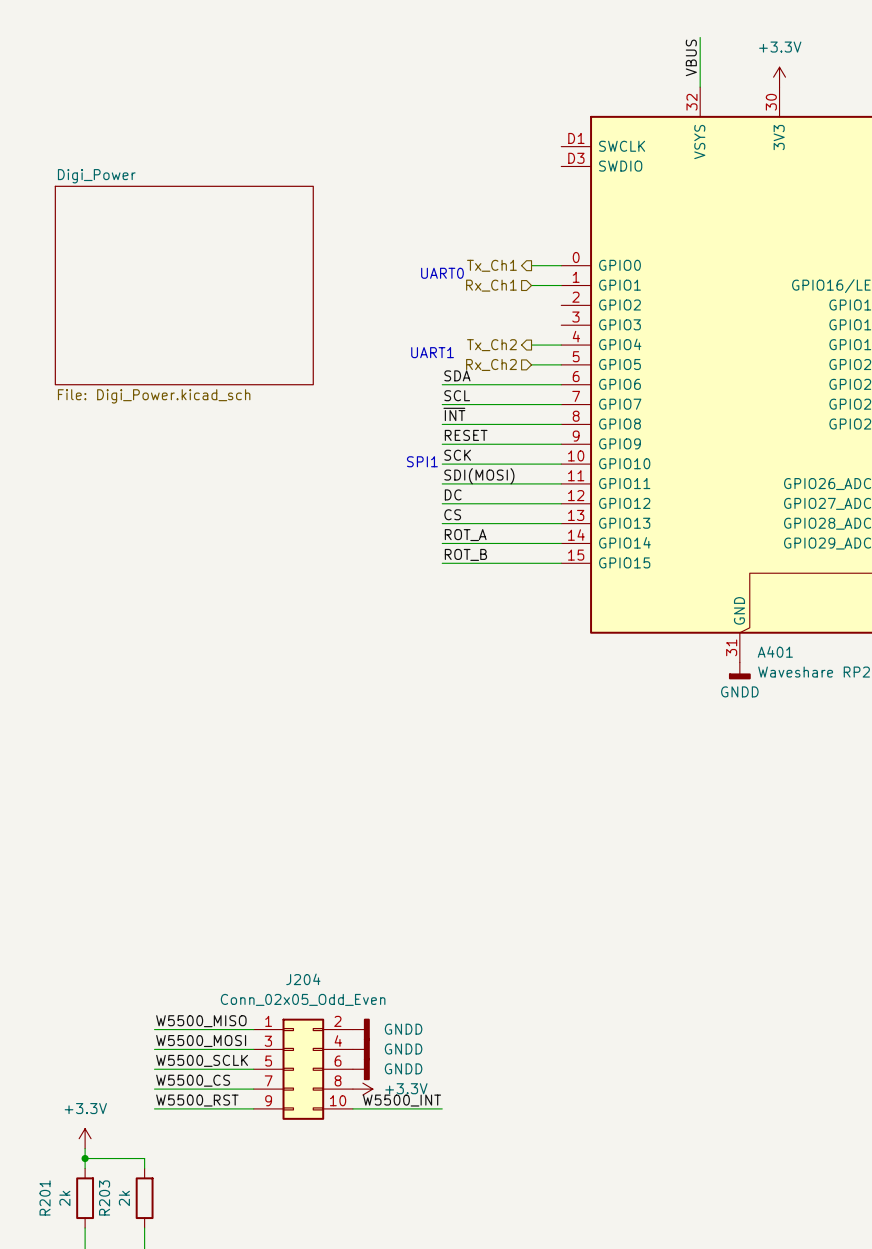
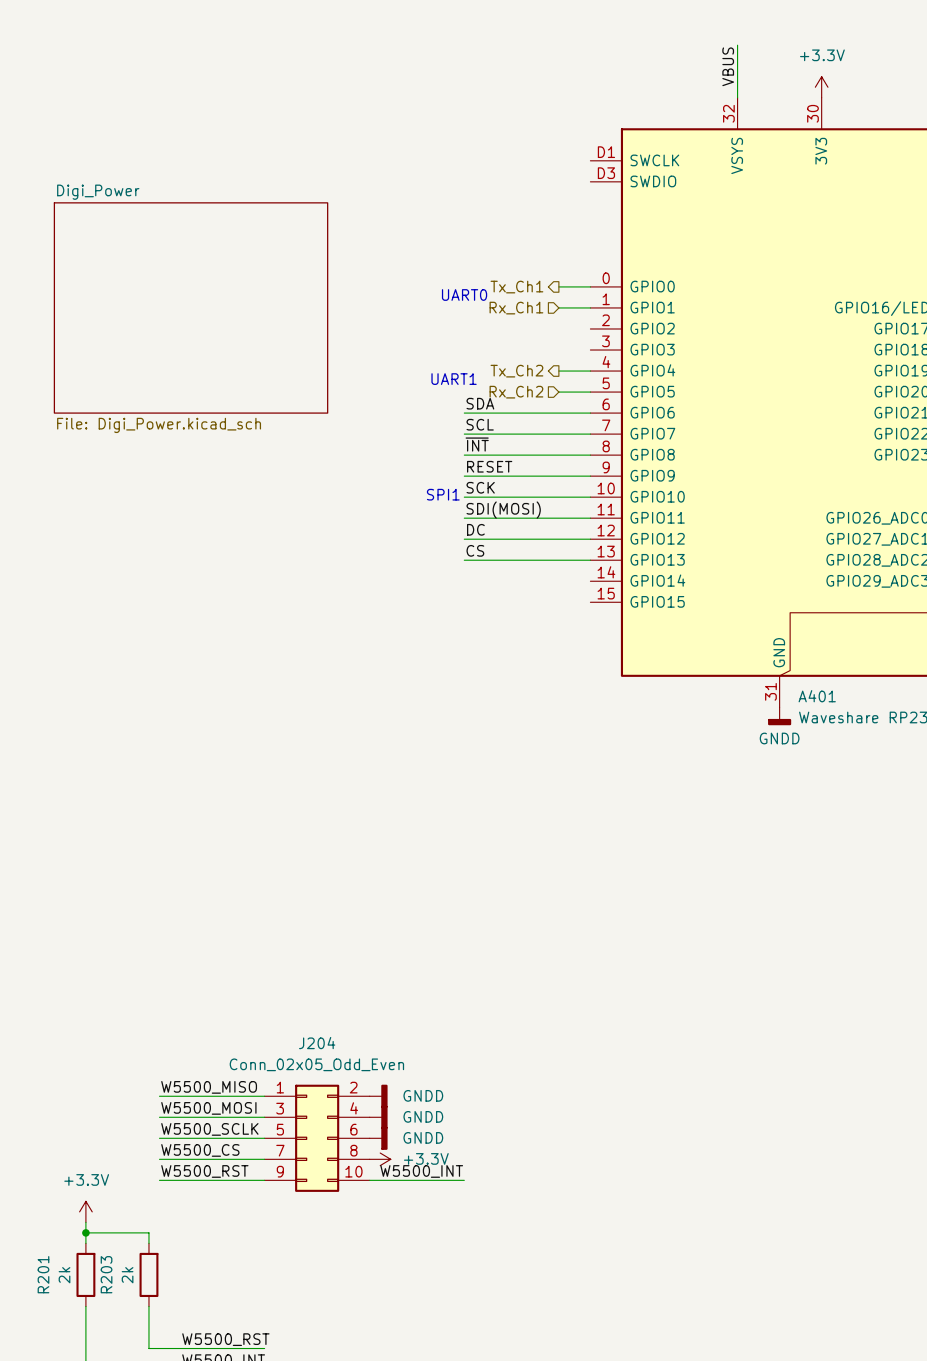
label: ROT_A (465, 535) -> none
wire: (442, 543) (561, 543) -> none
label: ROT_B (465, 554) -> none
wire: (442, 563) (561, 563) -> none

